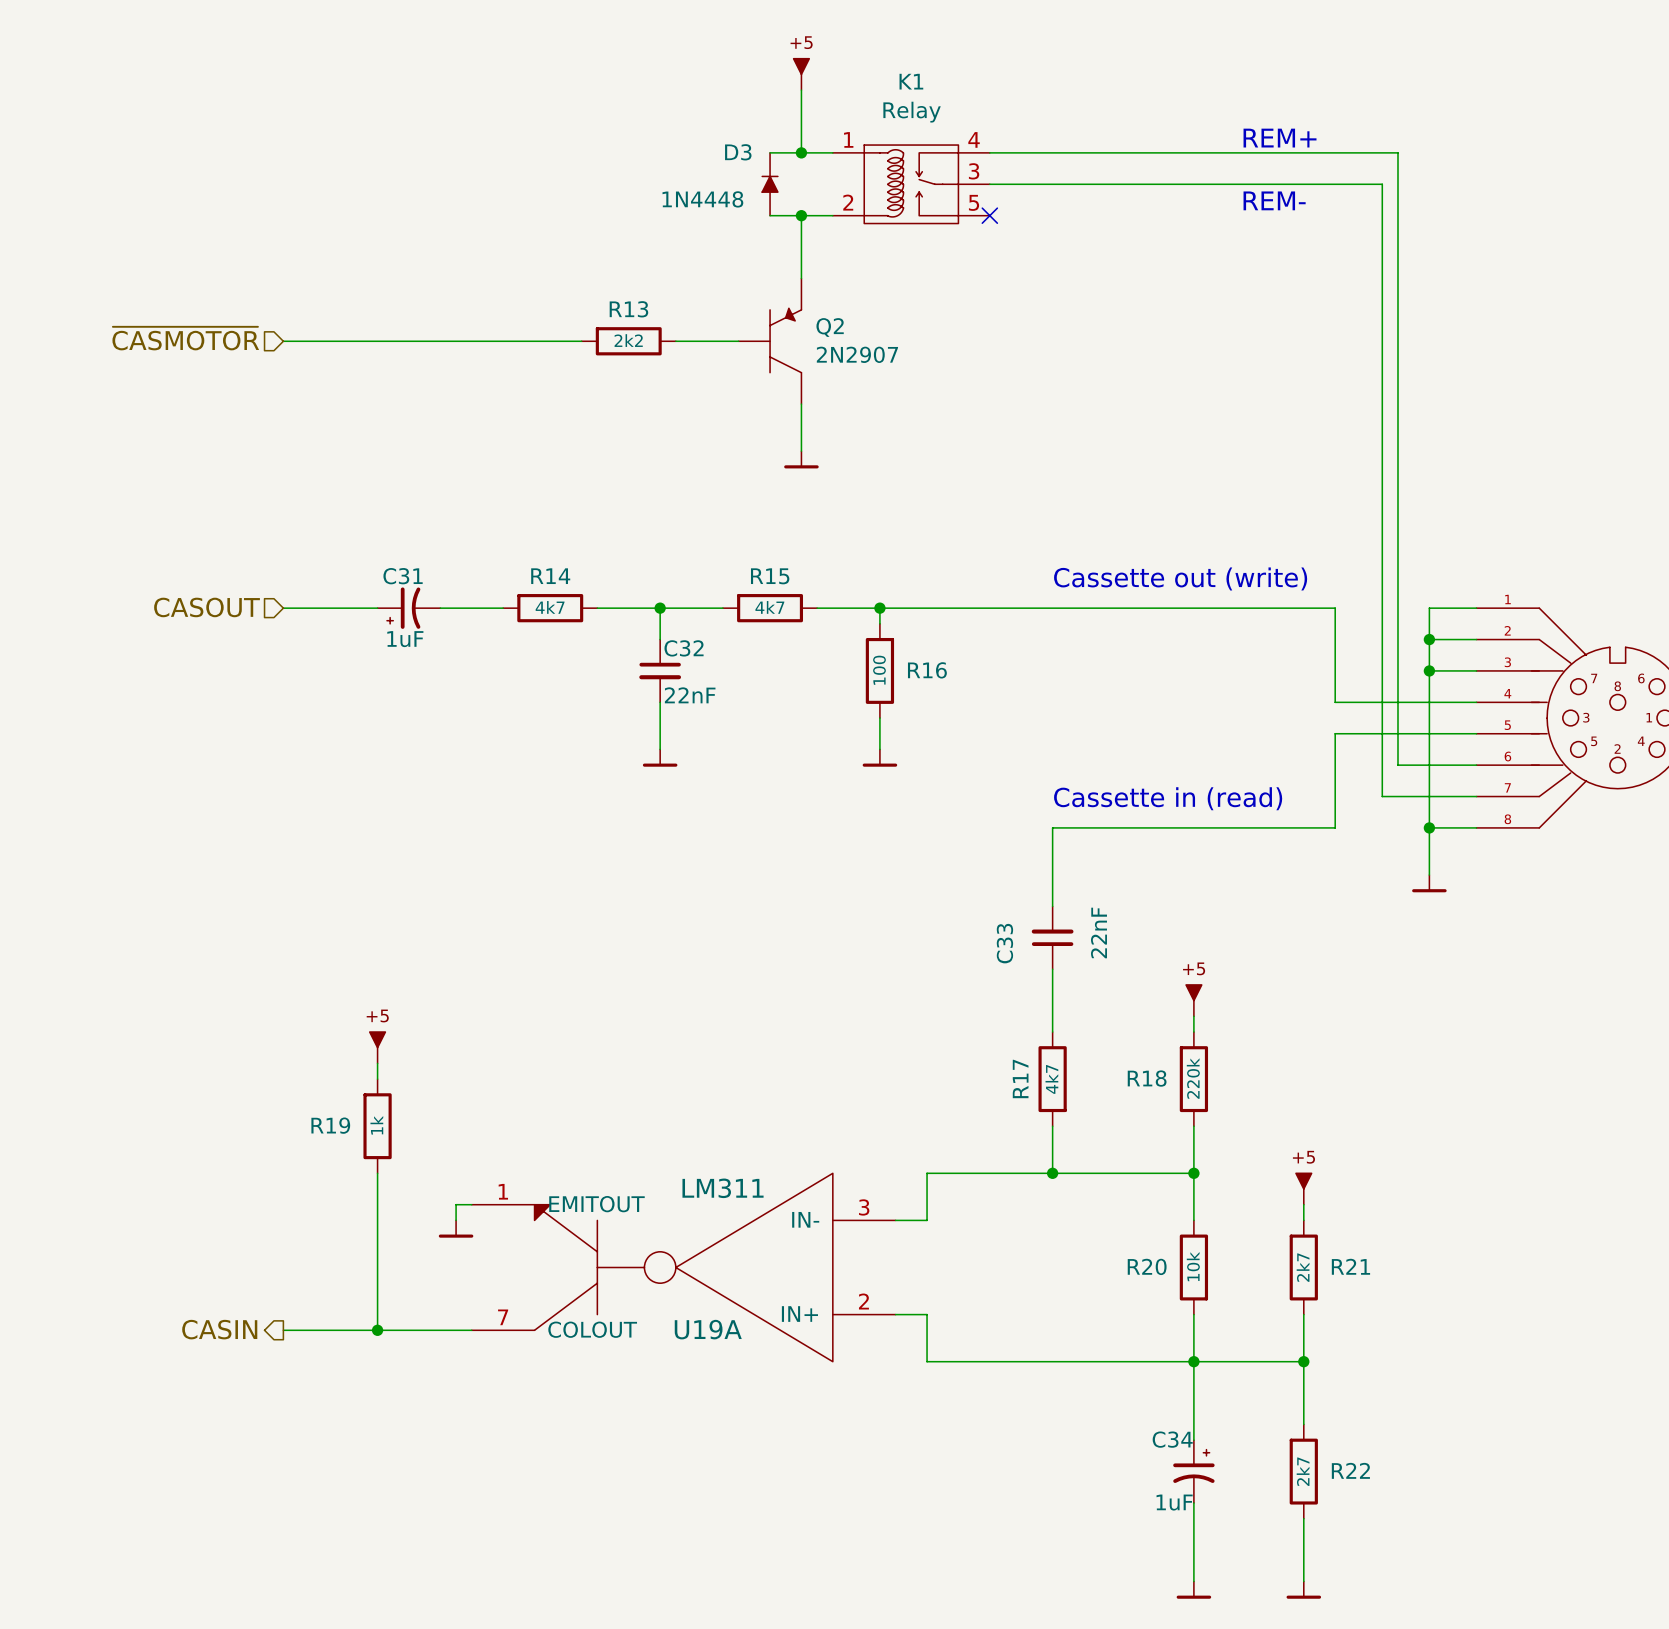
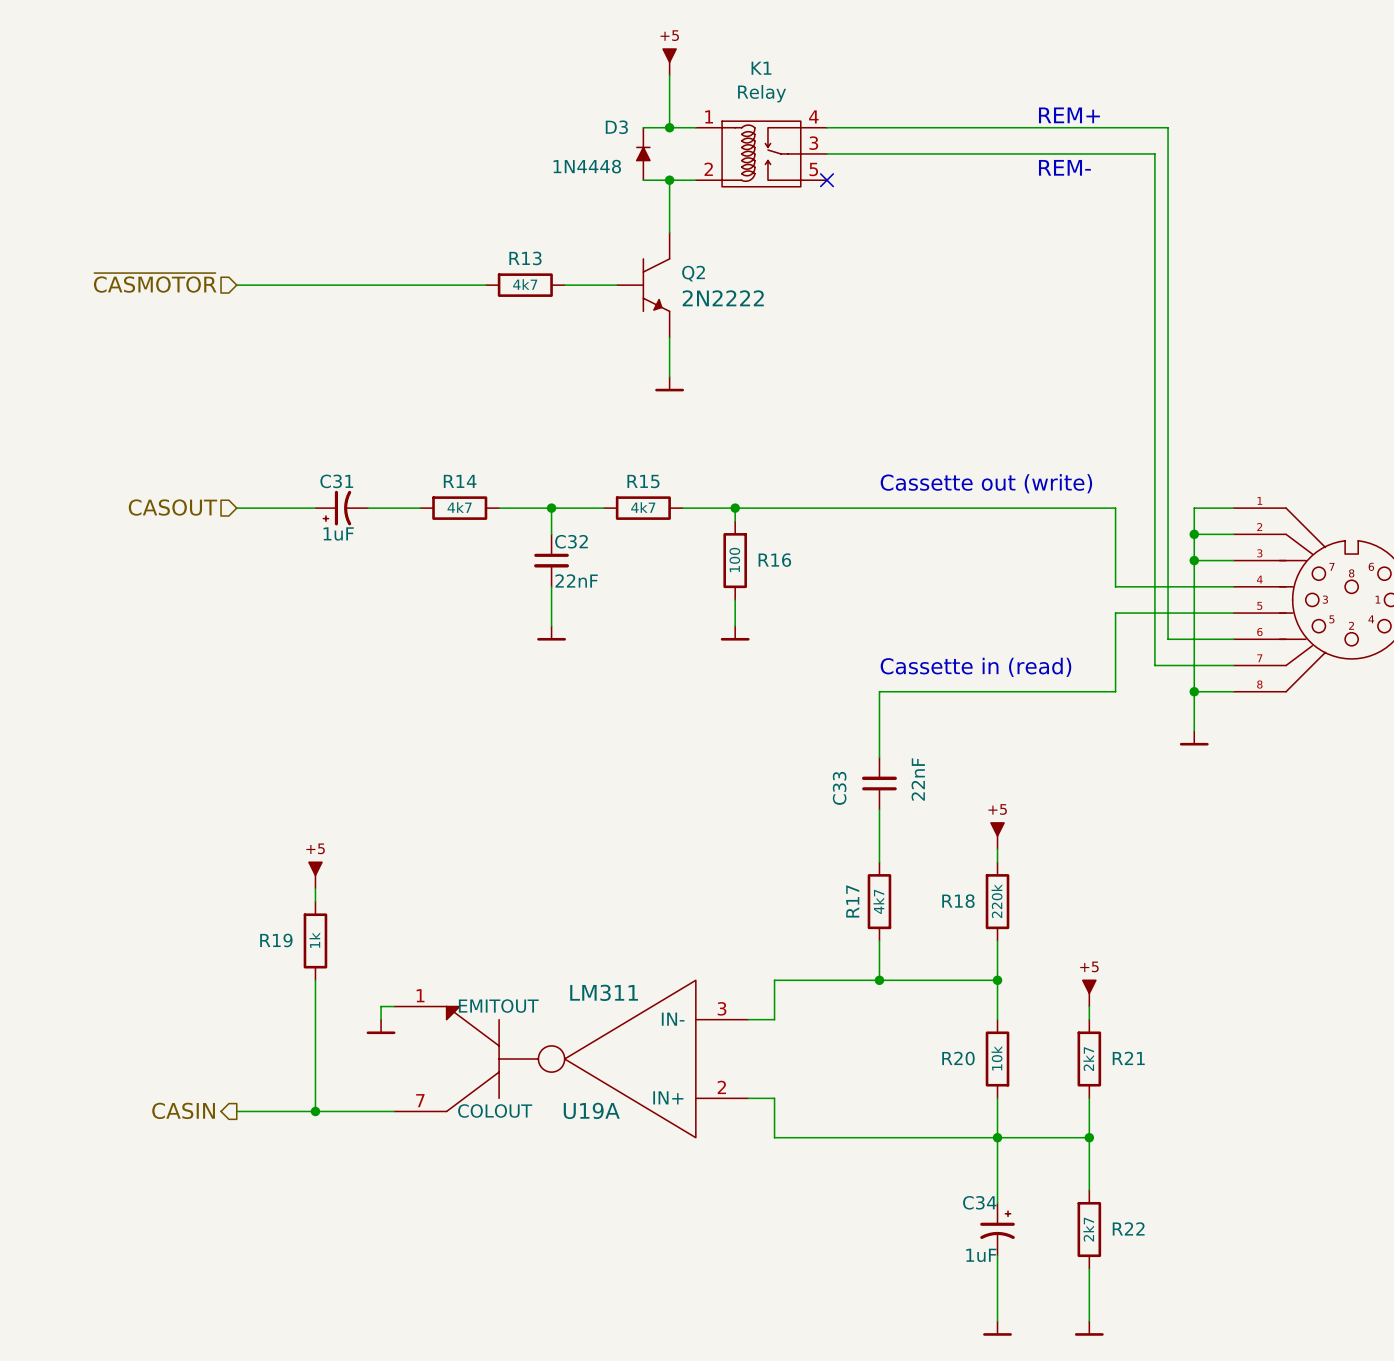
Q2 symbol: [738, 278, 802, 405] -> [617, 232, 670, 338]
R13 value: 2k2 (628, 340) -> 4k7 (525, 284)
Q2 value: 2N2907 (857, 354) -> 2N2222 (723, 298)

